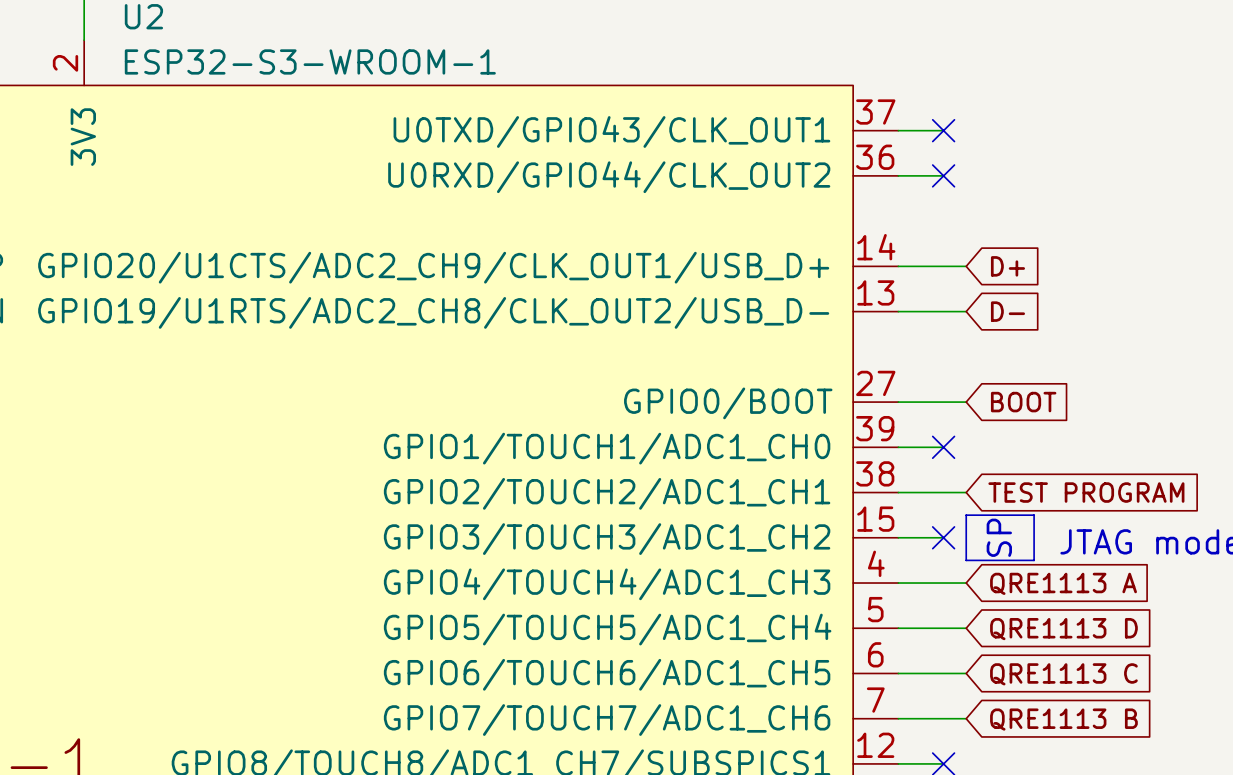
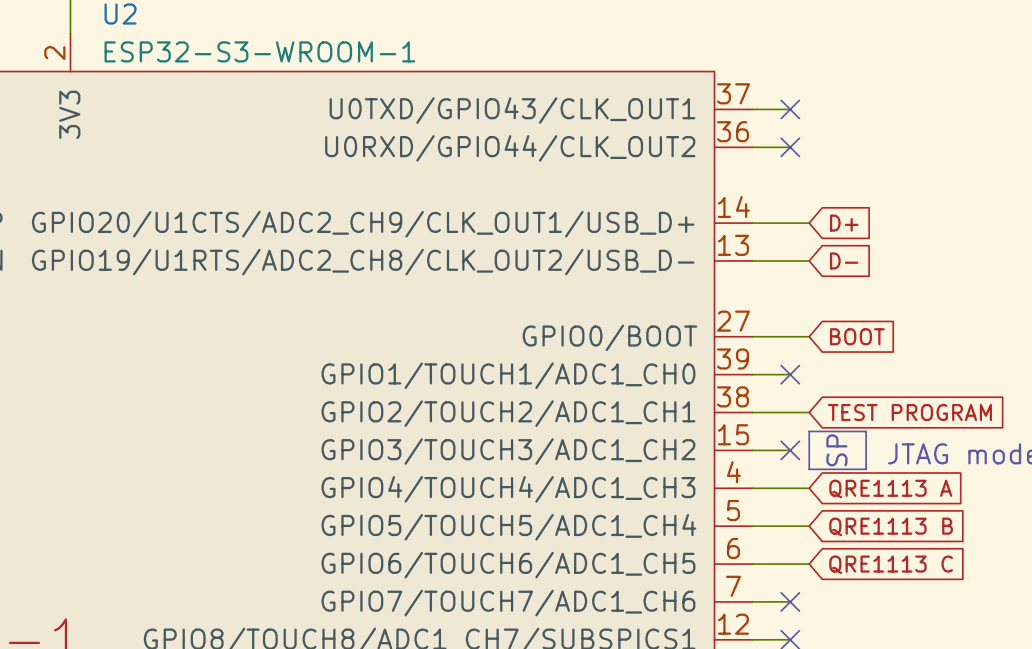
global label: QRE1113 D (1063, 629) -> QRE1113 B (891, 526)
wire: (943, 718) (966, 718) -> none
no-connect mark: none -> (790, 601)
global label: QRE1113 B (1063, 719) -> none

